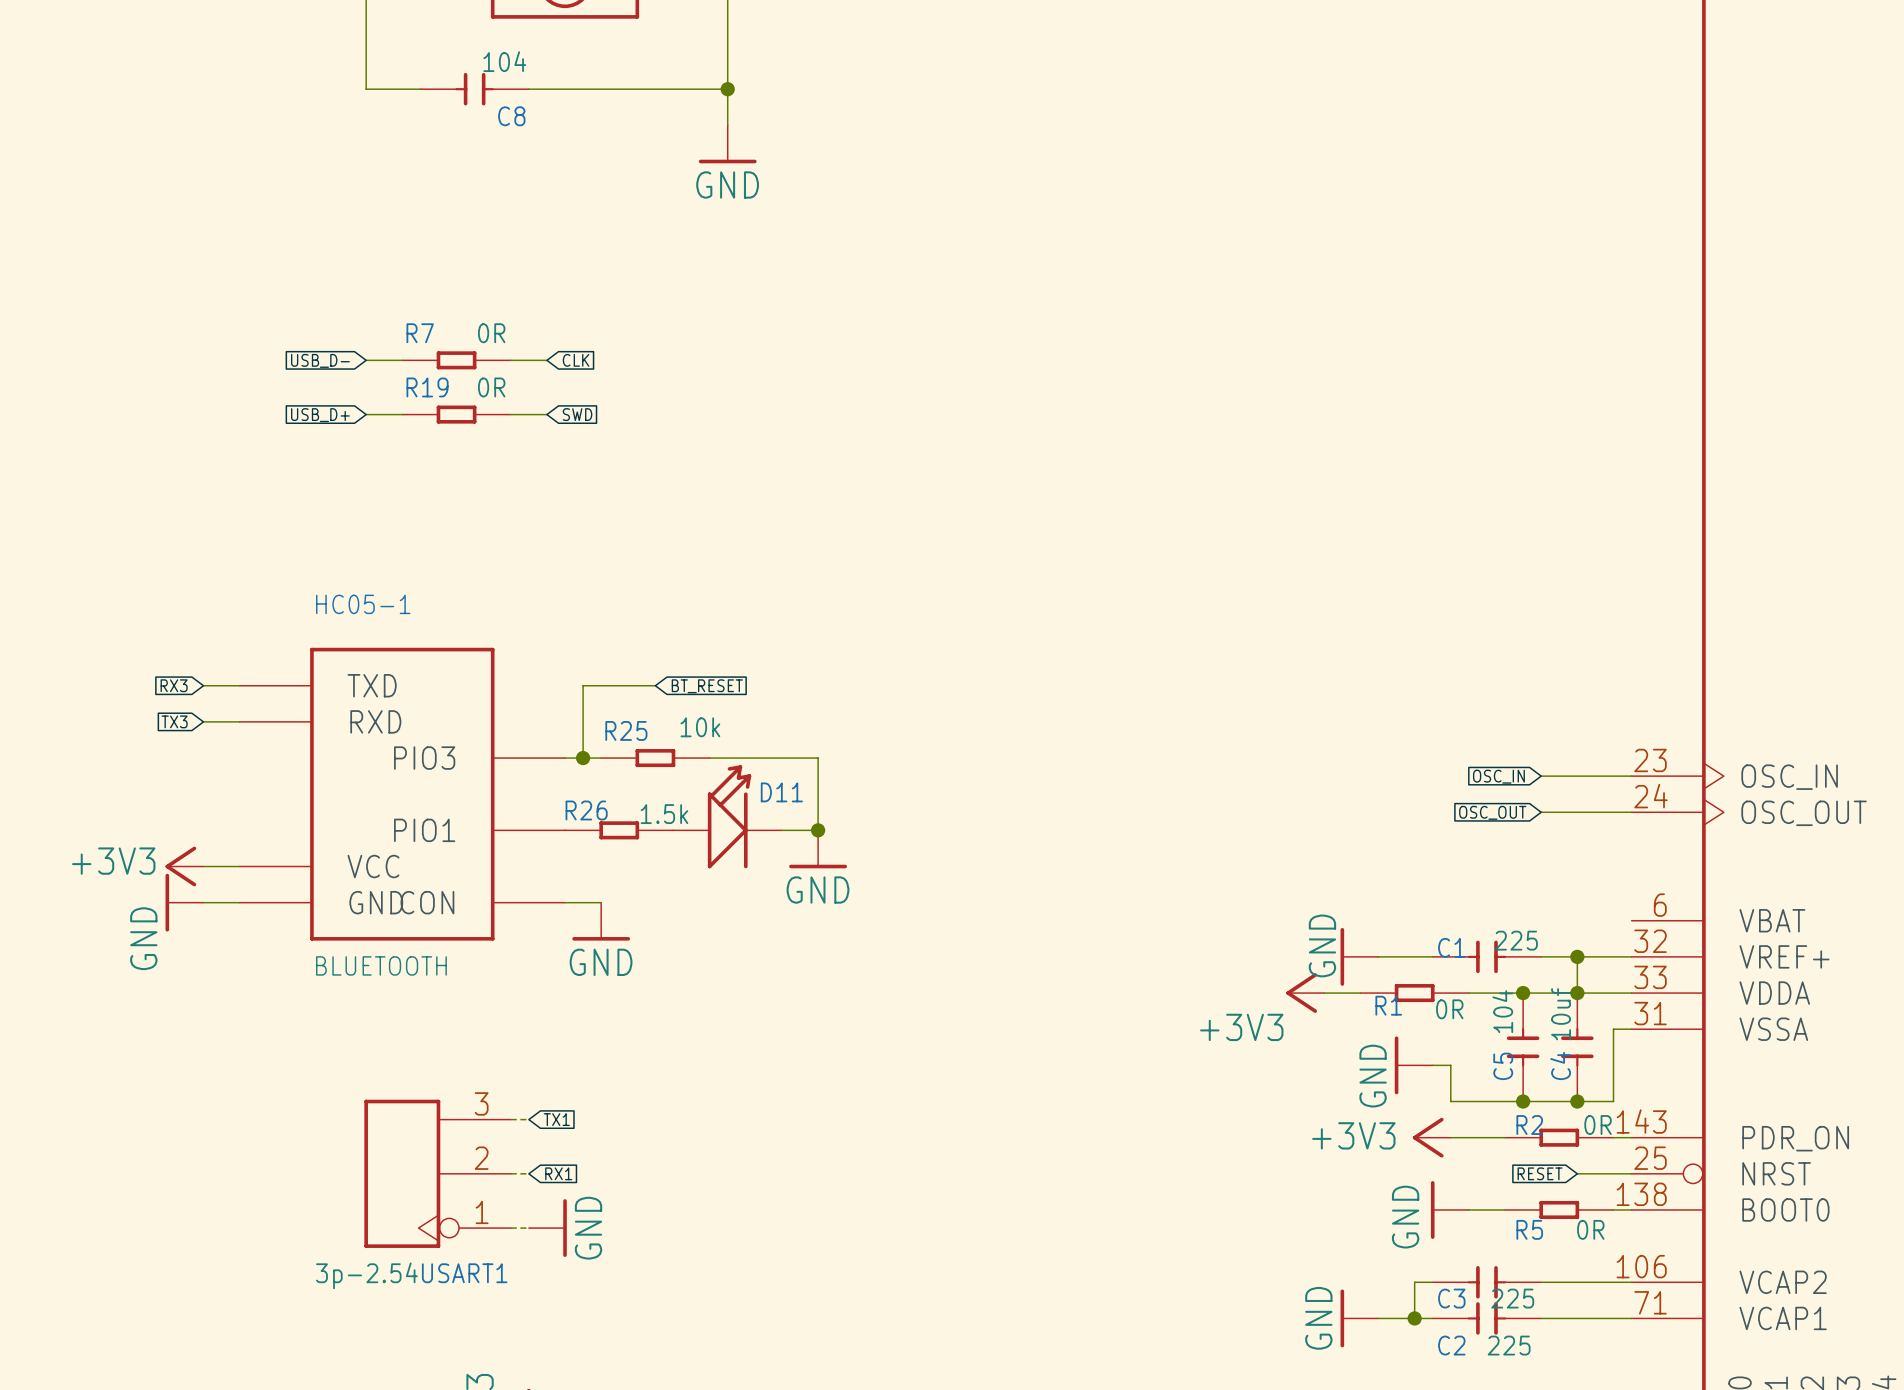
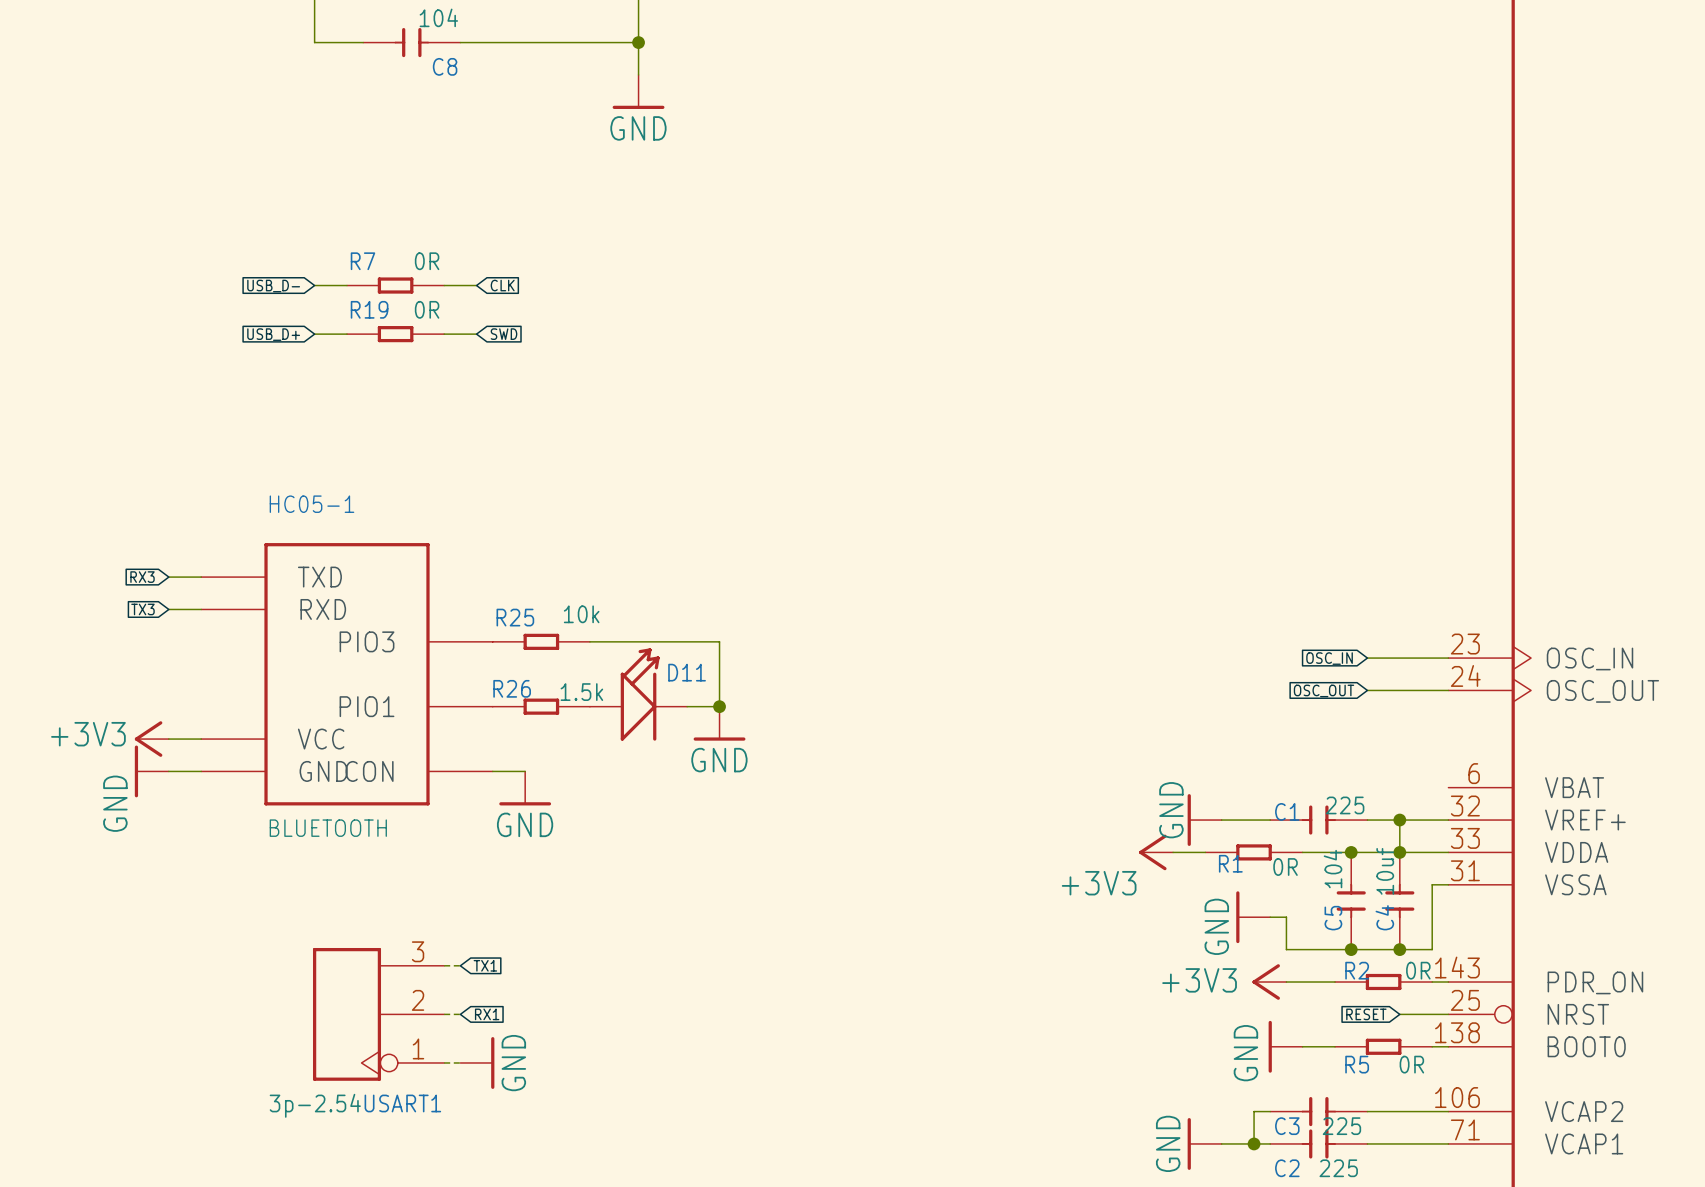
wire: (655, 685) (583, 685) (583, 758) -> none
global label: BT_RESET (707, 686) -> none
junction: (583, 758) -> none
R25 position: (655, 758) -> (541, 641)

